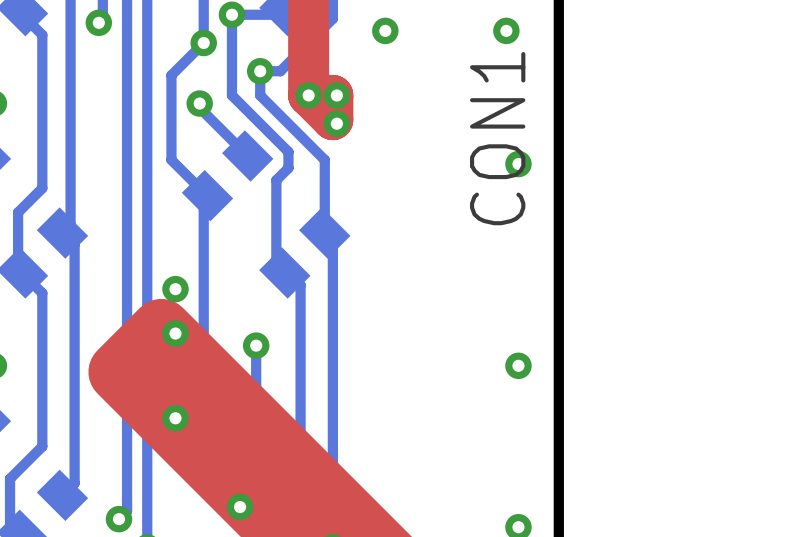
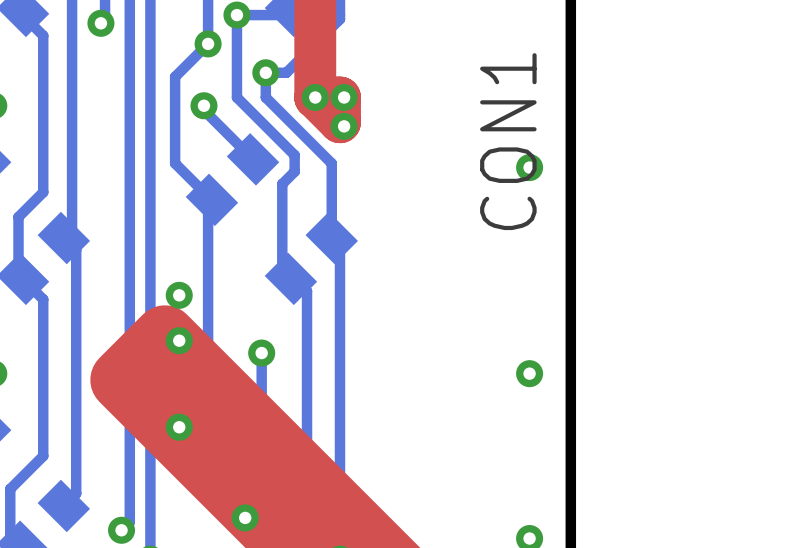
via: (385, 30) -> none
via: (506, 30) -> none

